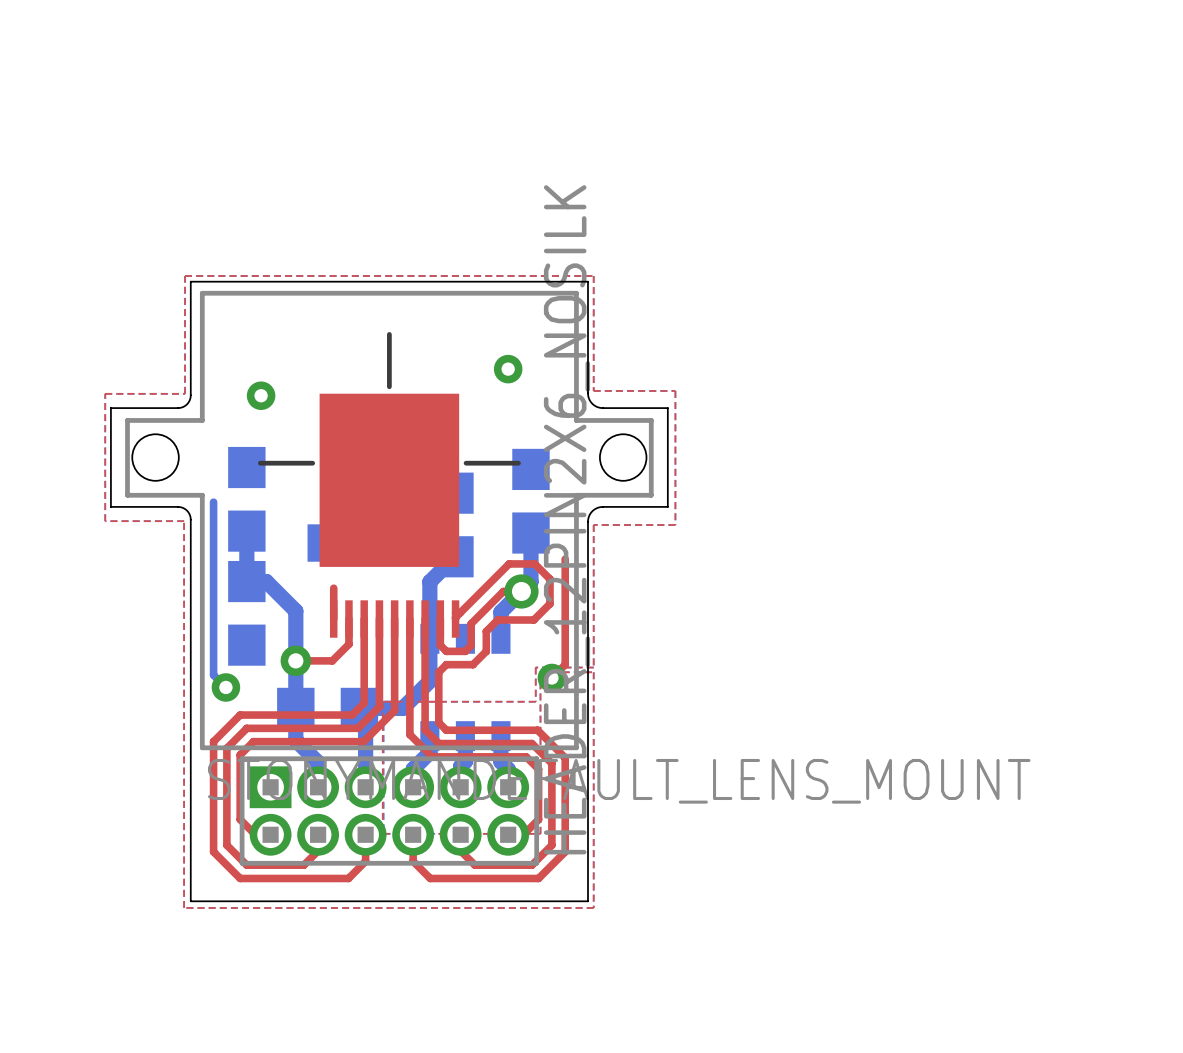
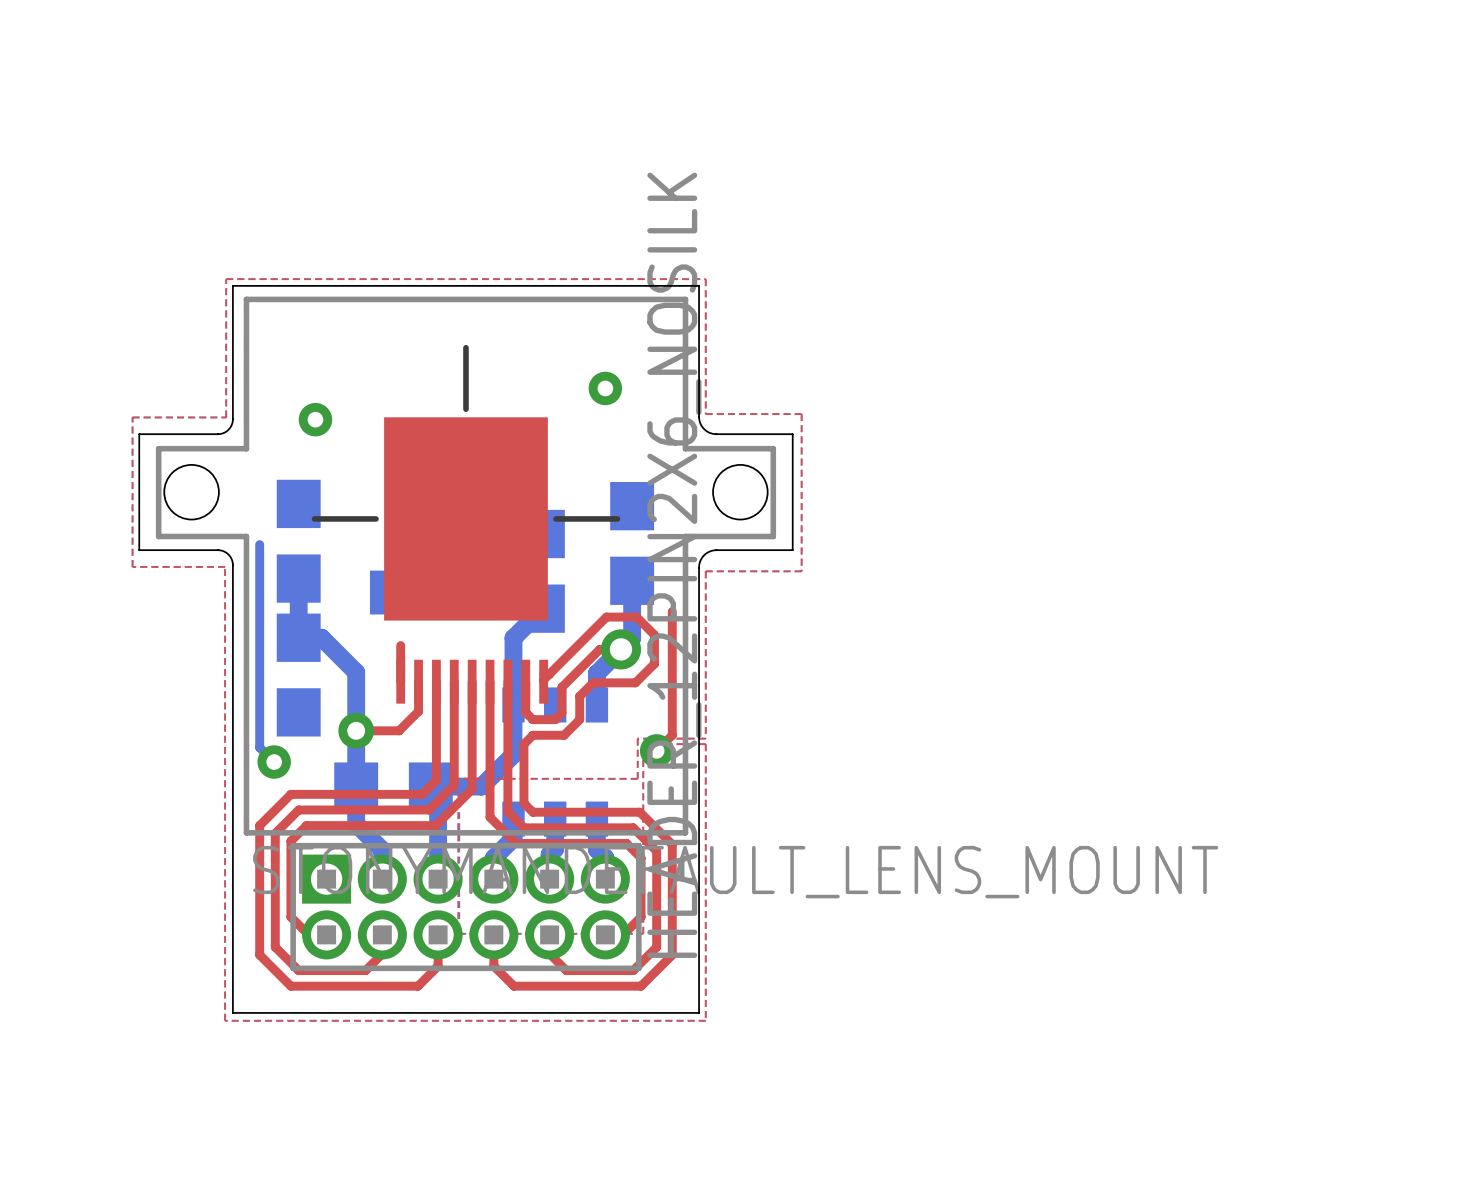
part footprint: [125, 290, 654, 751] -> [155, 296, 777, 836]

